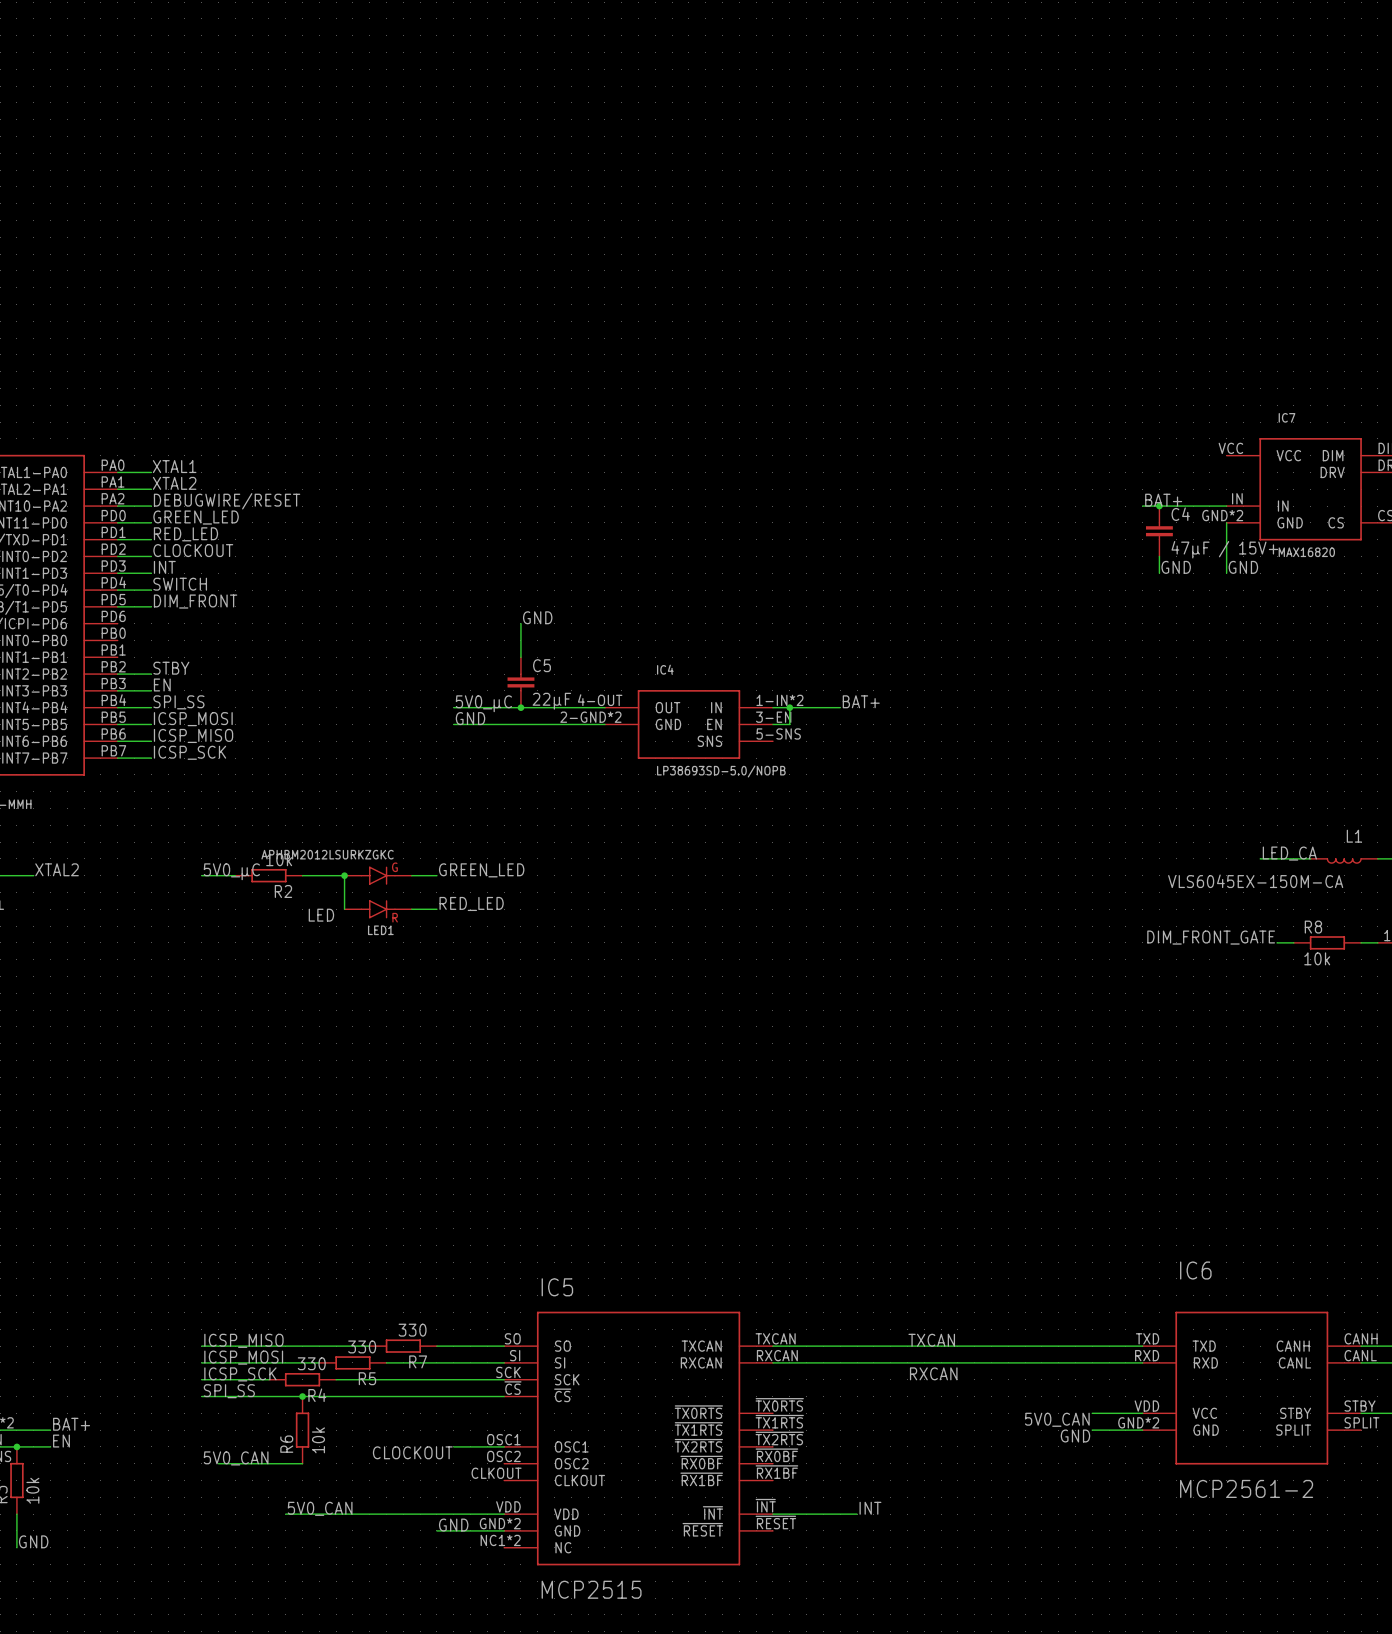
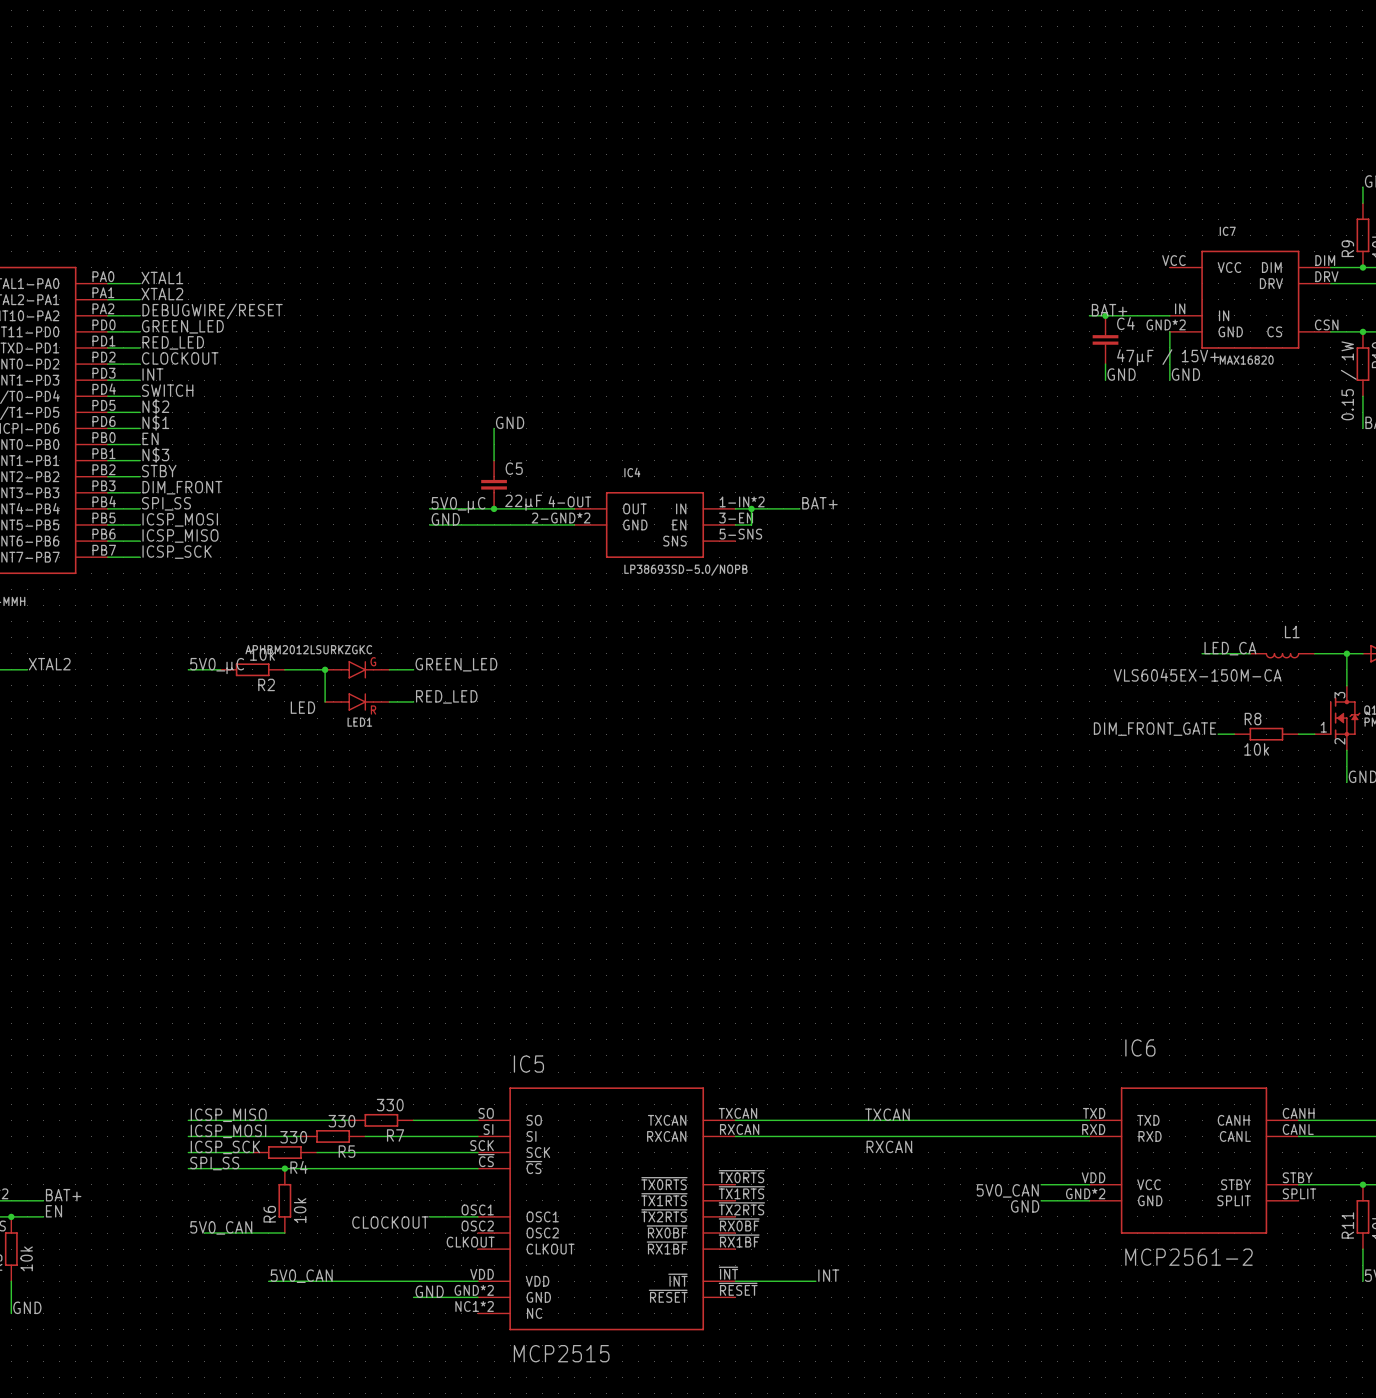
label: DIM_FRONT (195, 601) -> N$2 (155, 406)
label: none -> N$1 (155, 422)
wire: none -> (107, 428) (140, 428)
label: none -> EN (150, 438)
wire: none -> (107, 444) (140, 444)
label: none -> N$3 (155, 454)
wire: none -> (107, 460) (140, 460)
label: EN (162, 684) -> DIM_FRONT (182, 487)

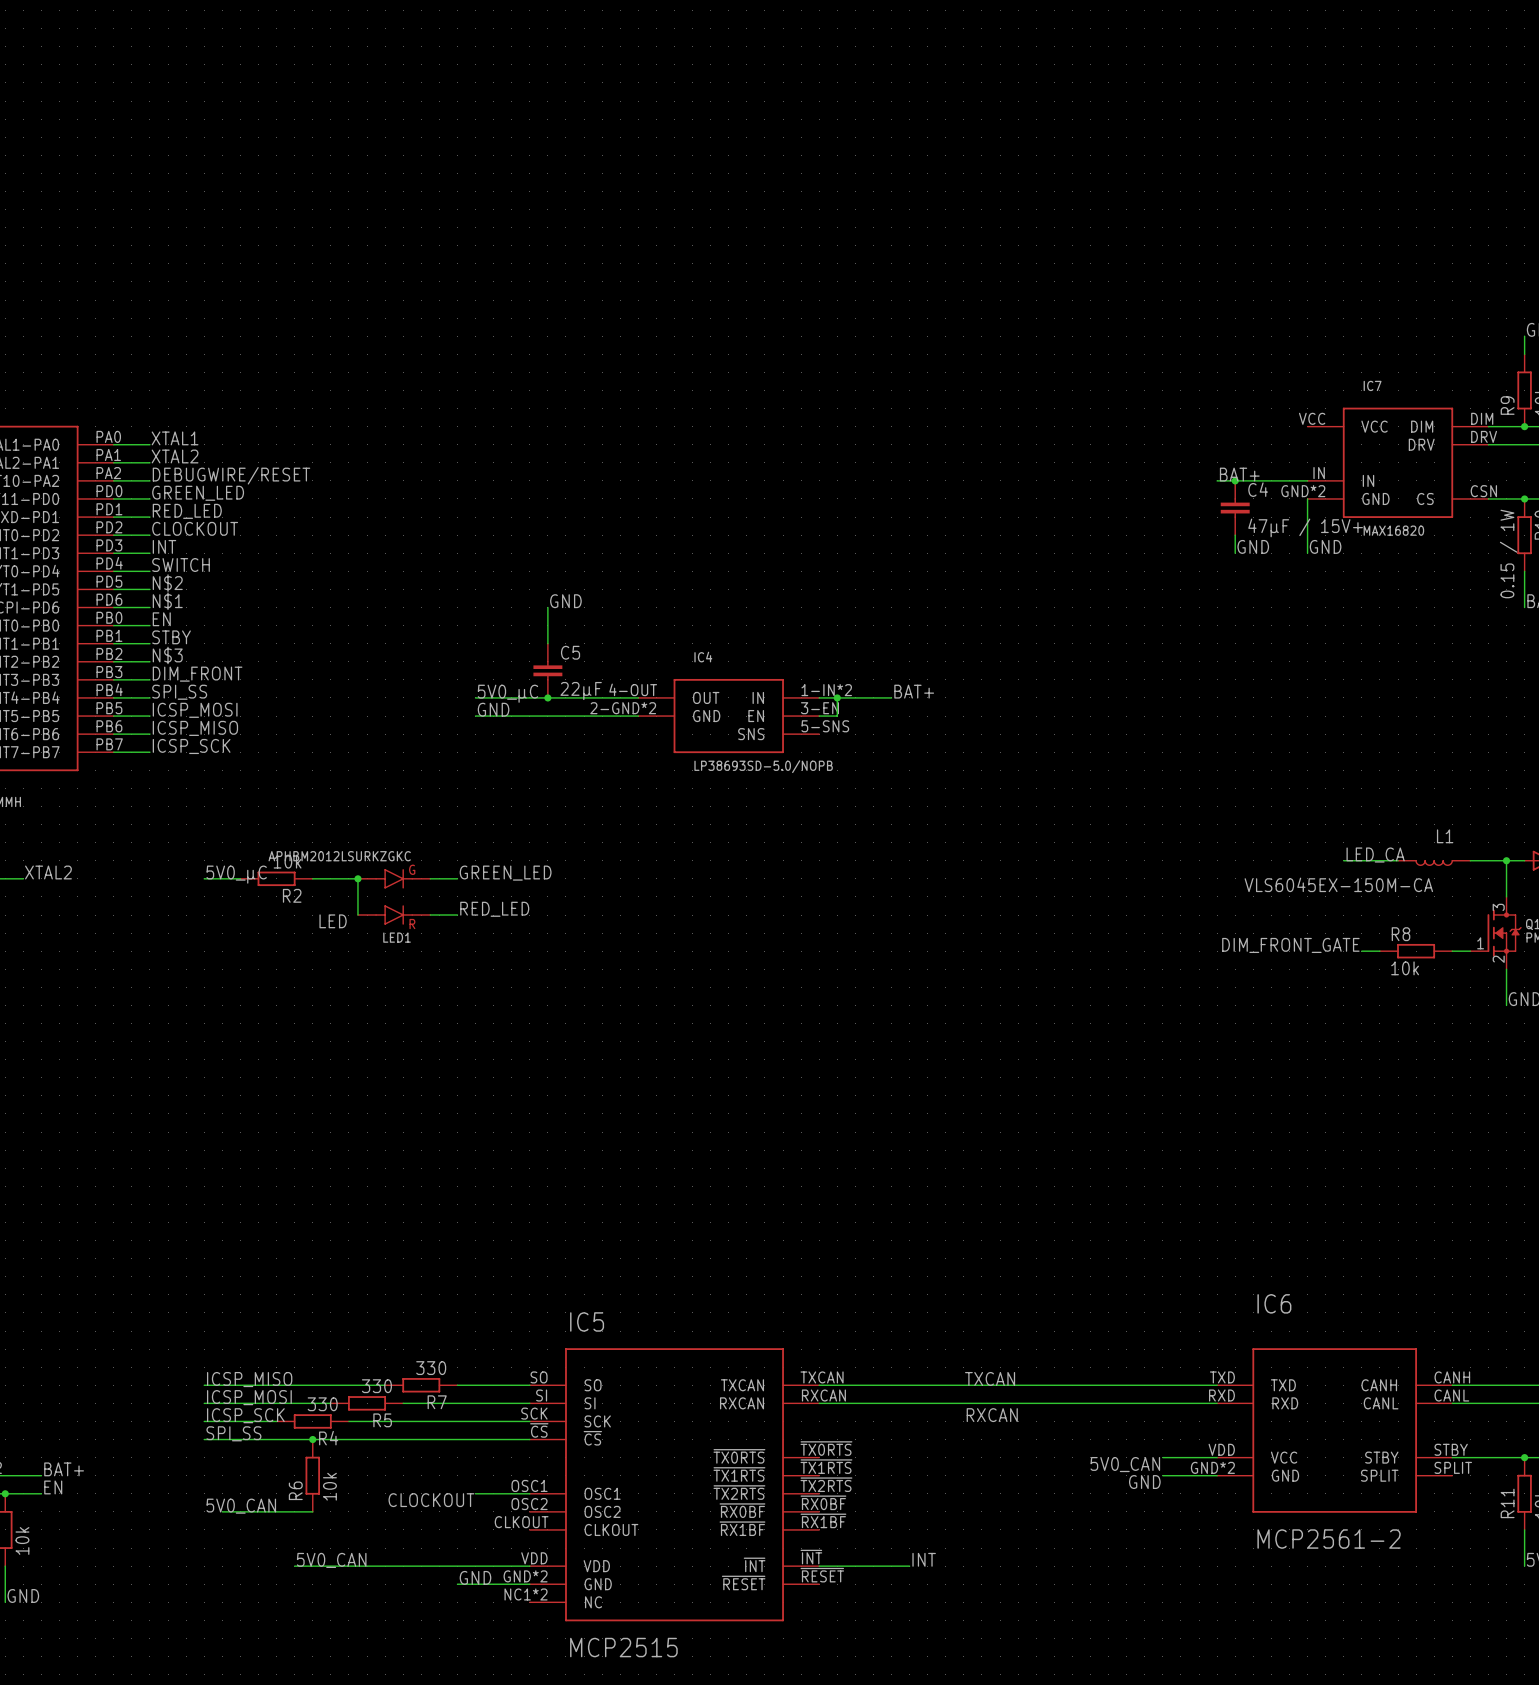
label: N$3 (155, 454) -> STBY (171, 637)
label: STBY (159, 471) -> N$3 (167, 655)

